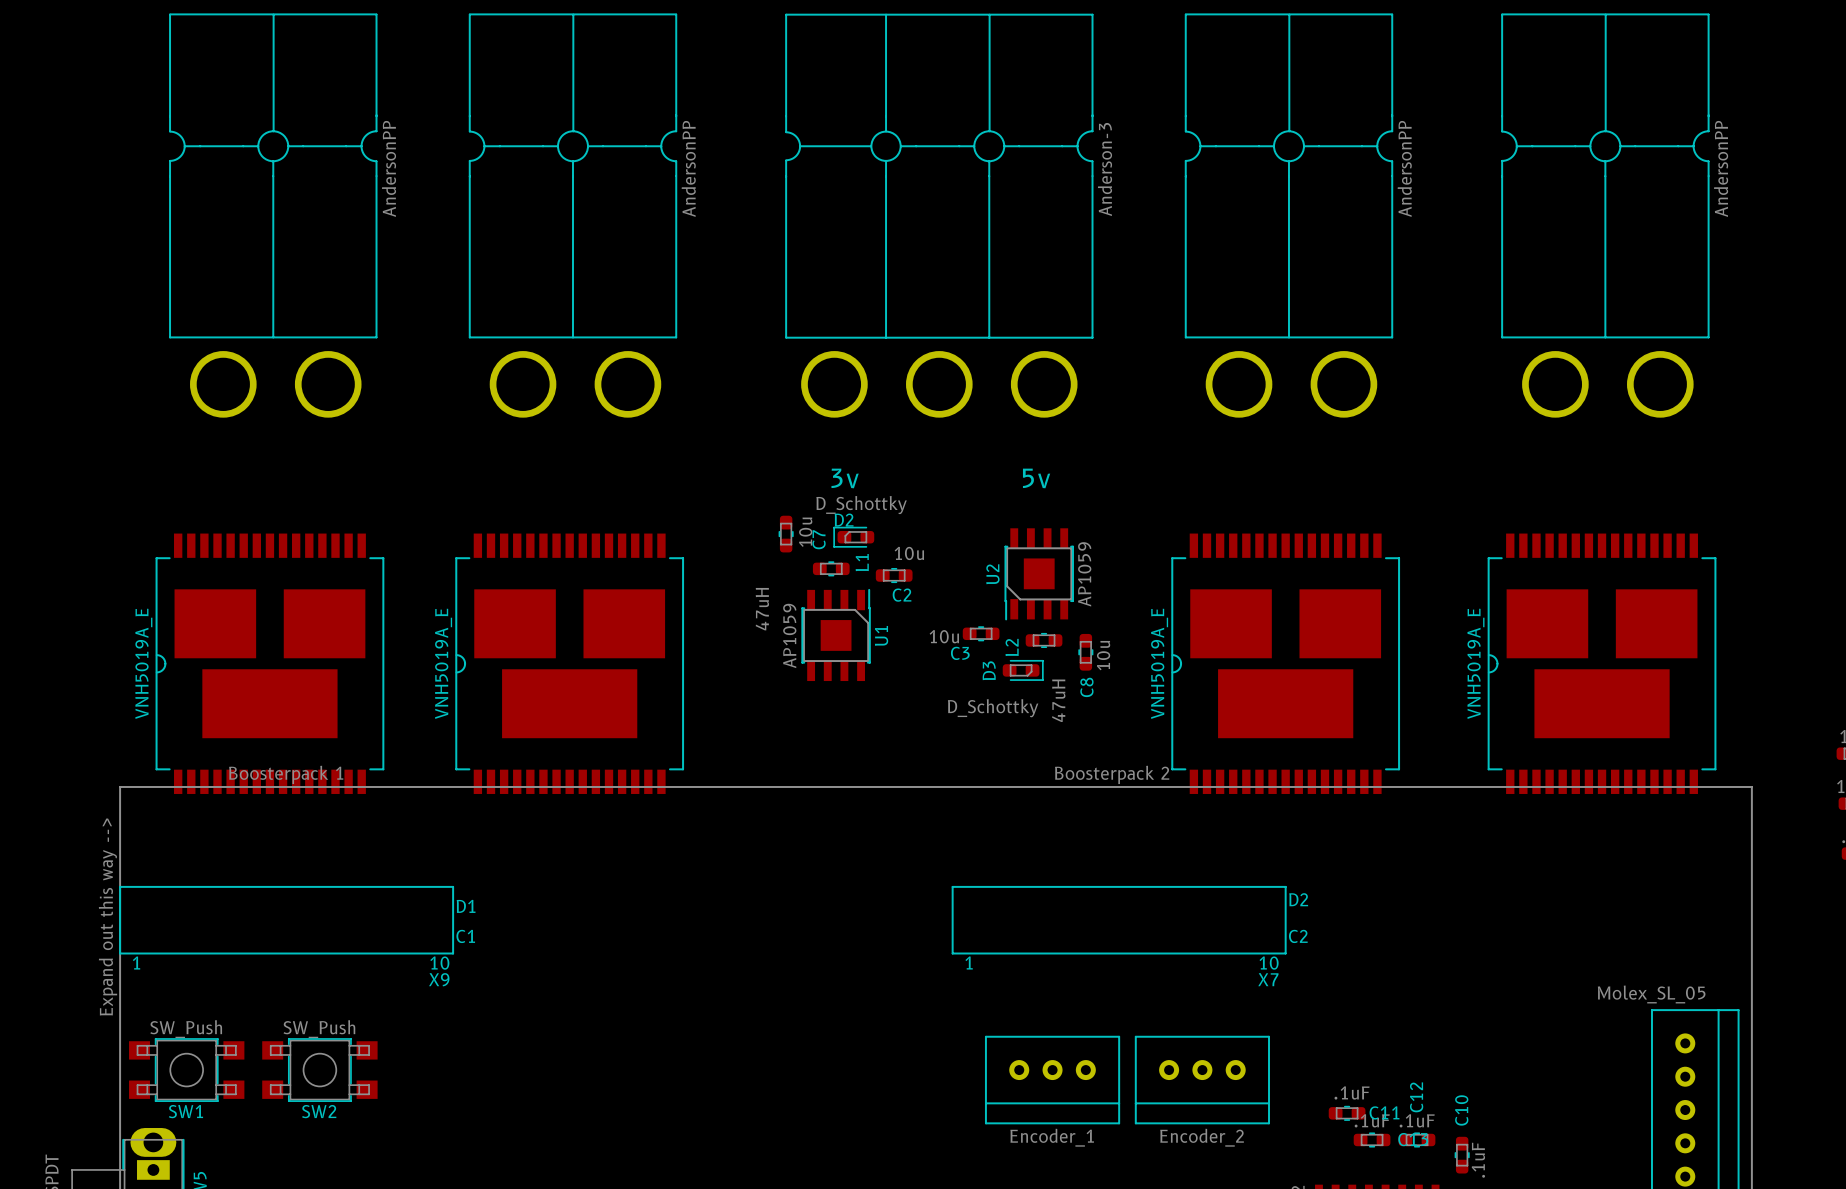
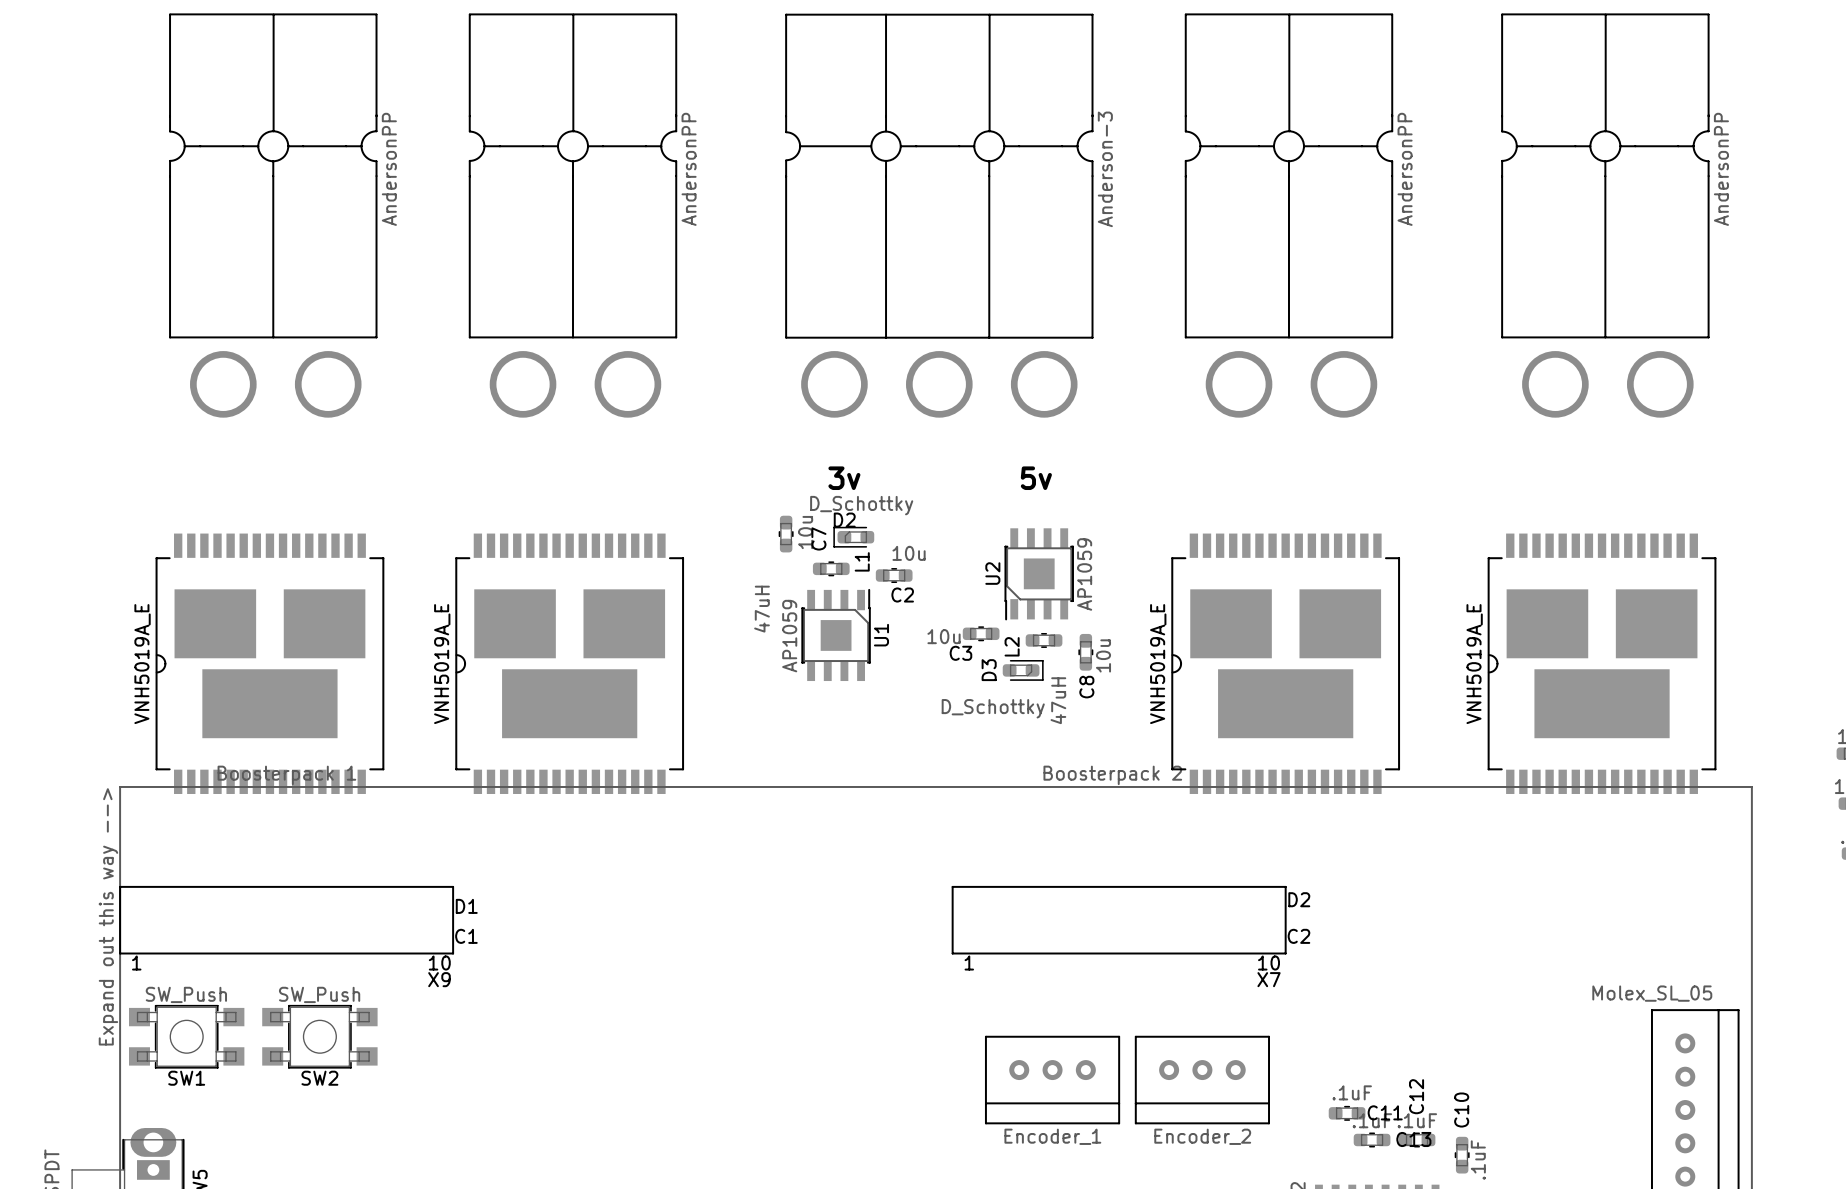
SW1 position: (186, 1070) -> (186, 1036)
SW2 position: (319, 1070) -> (319, 1036)

